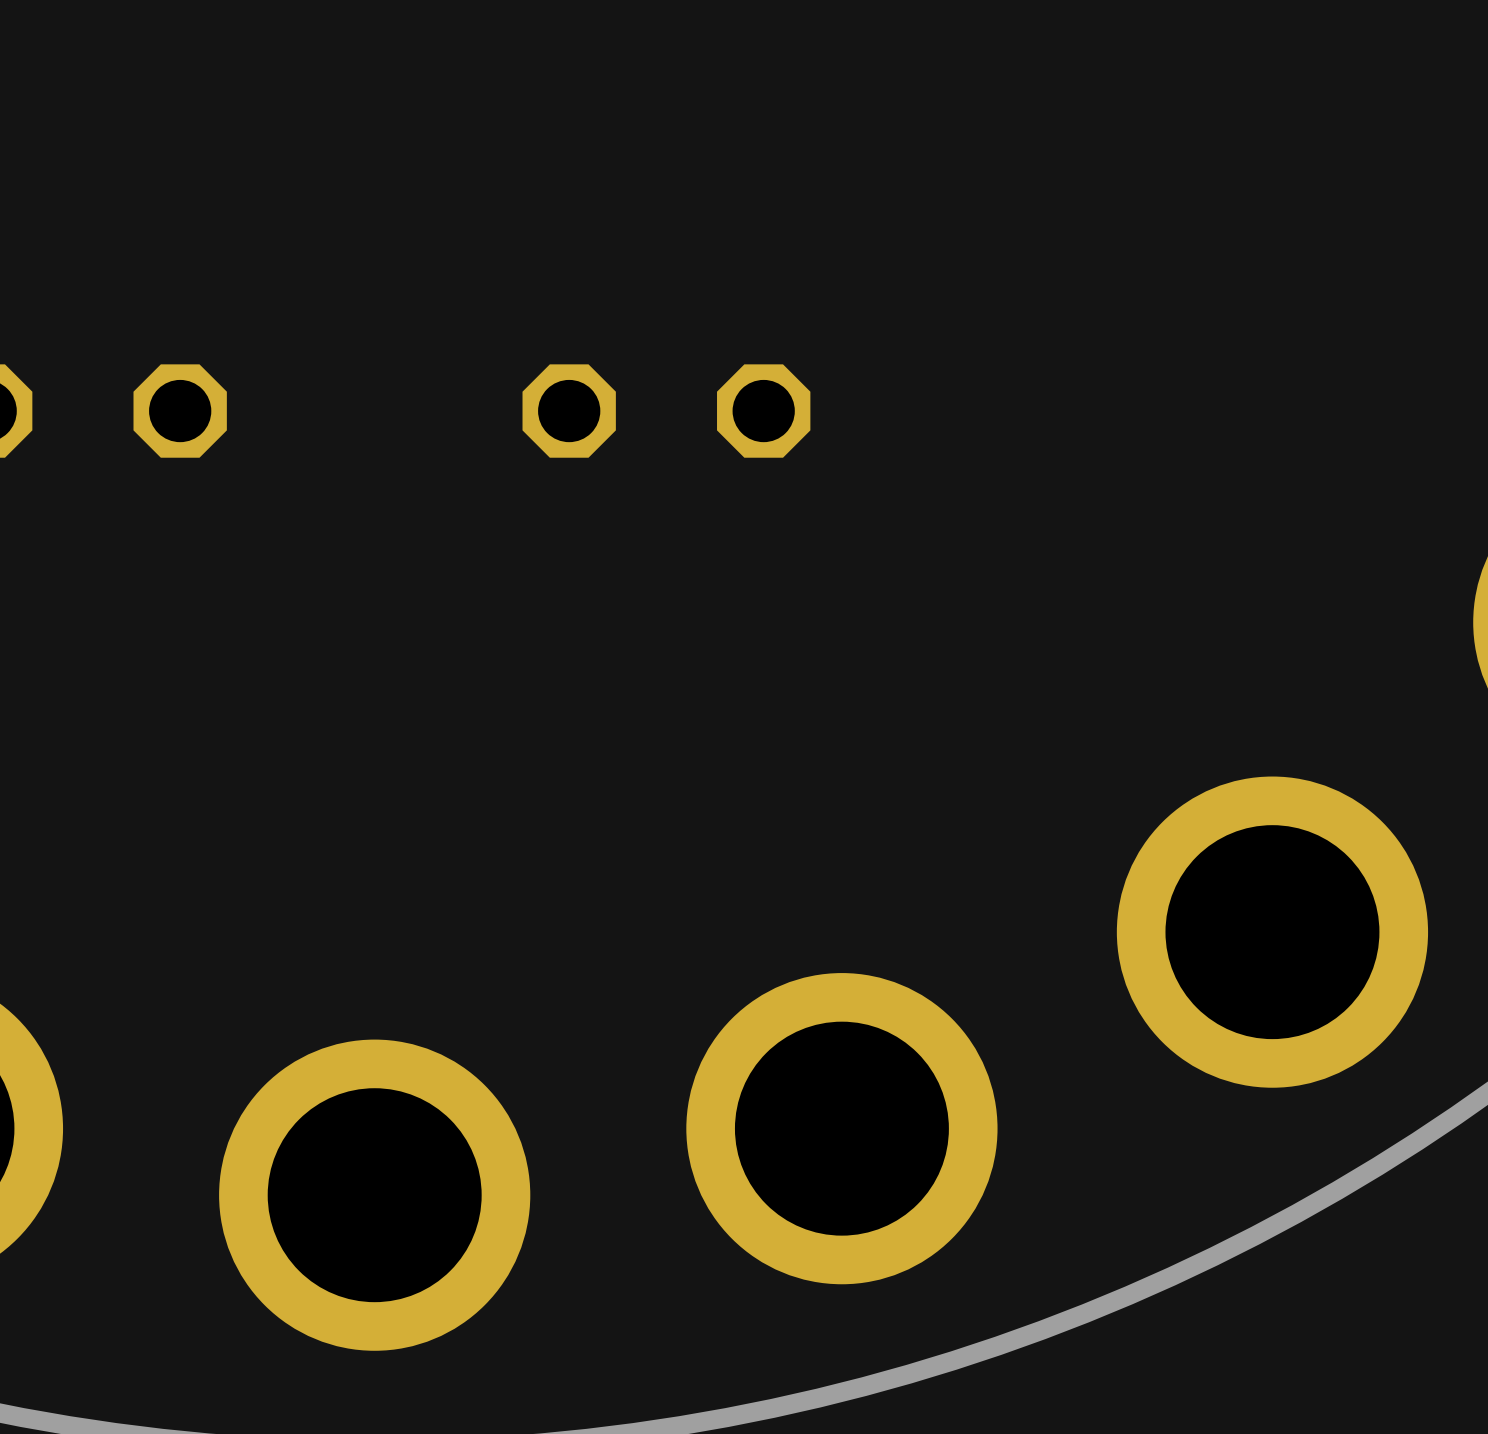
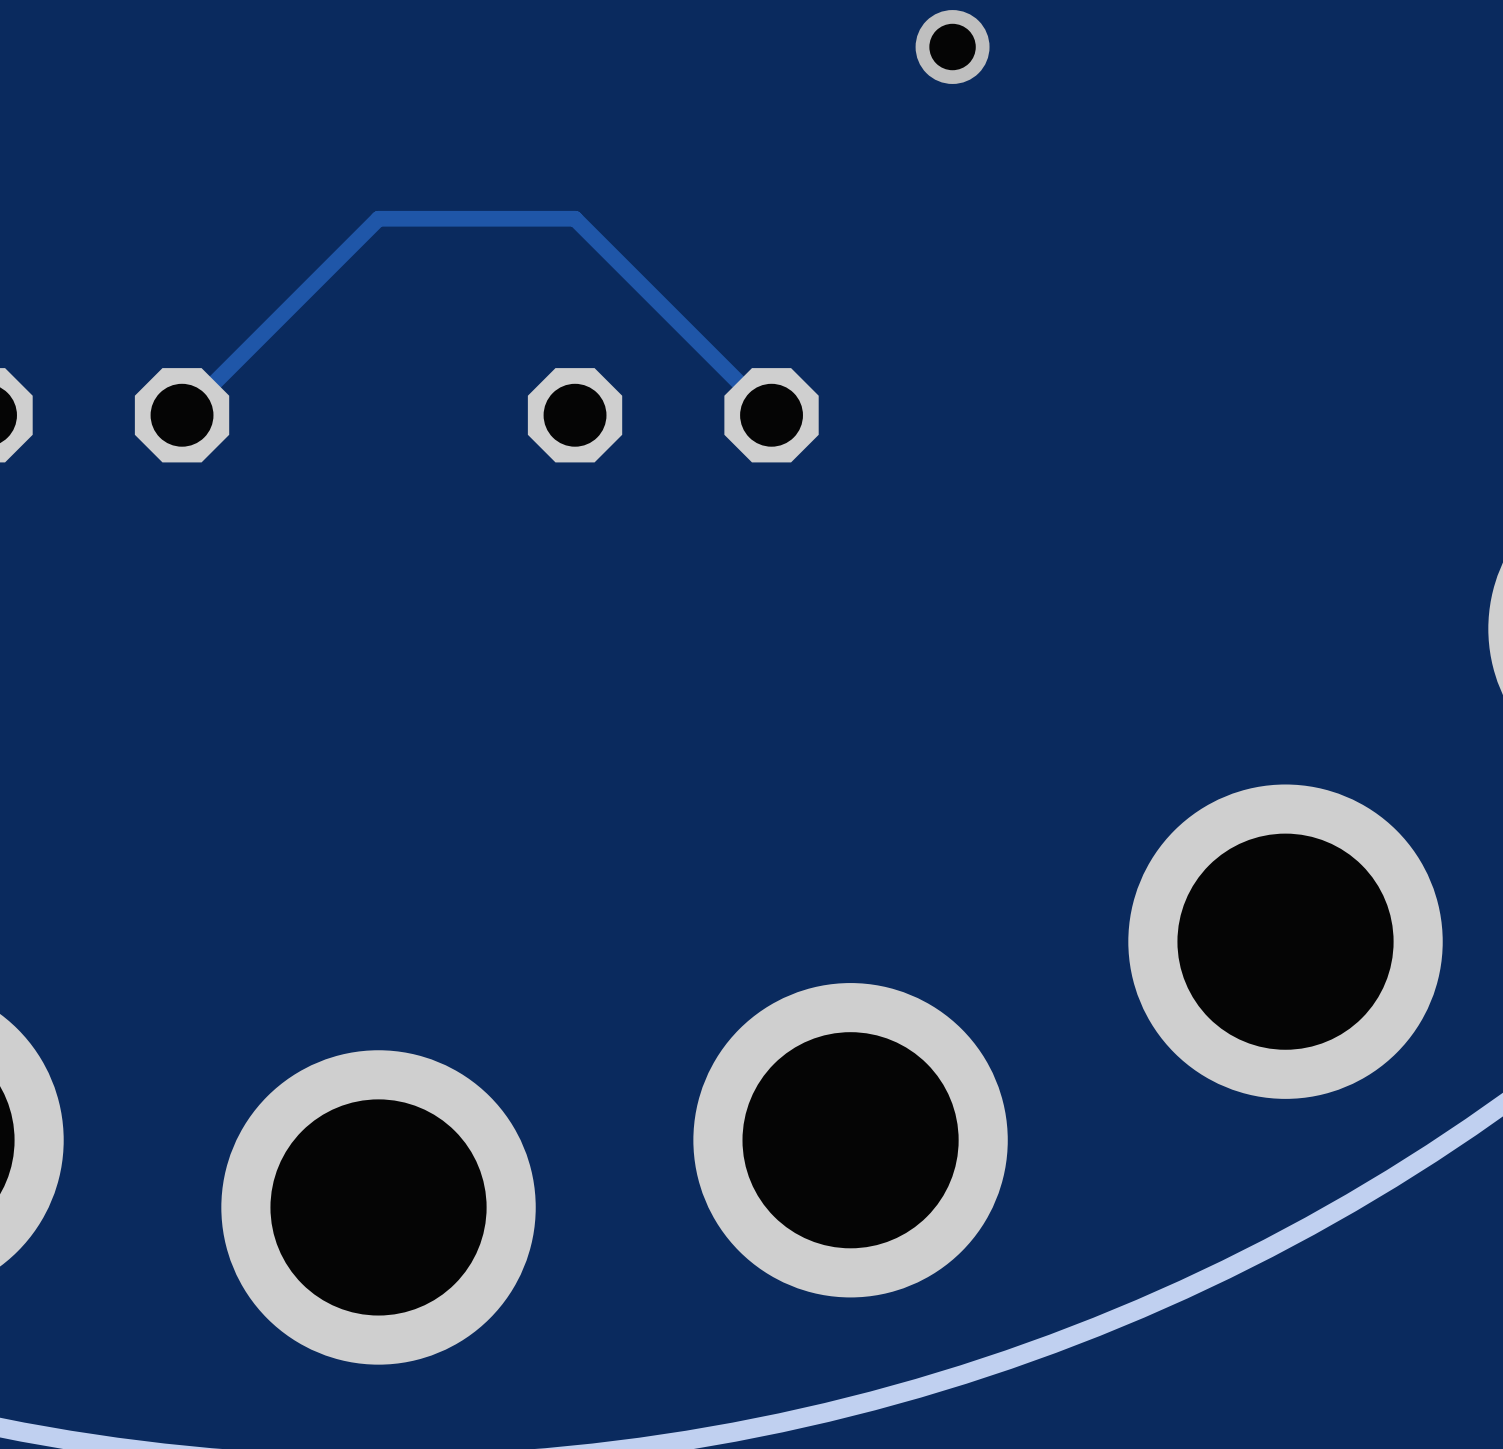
via: none -> (952, 47)
track: none -> (771, 415) (575, 218) (378, 218) (182, 415)

